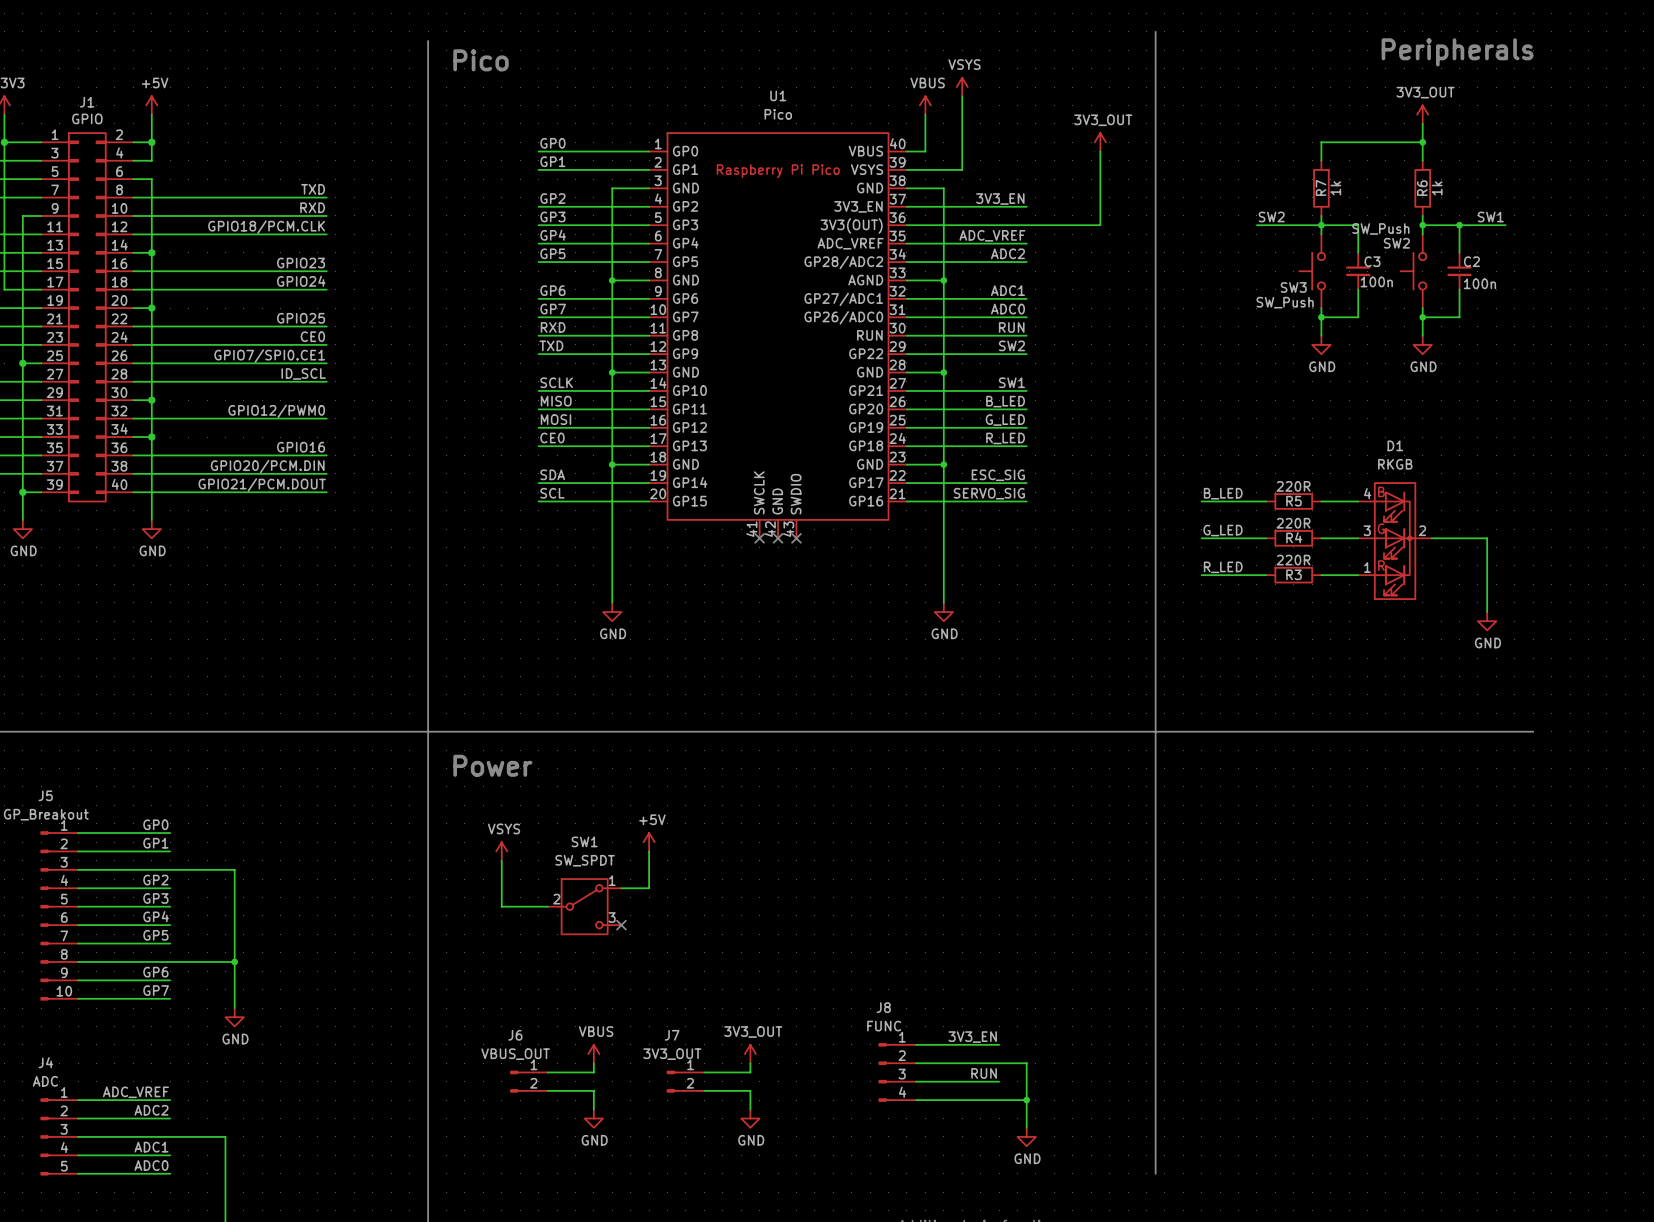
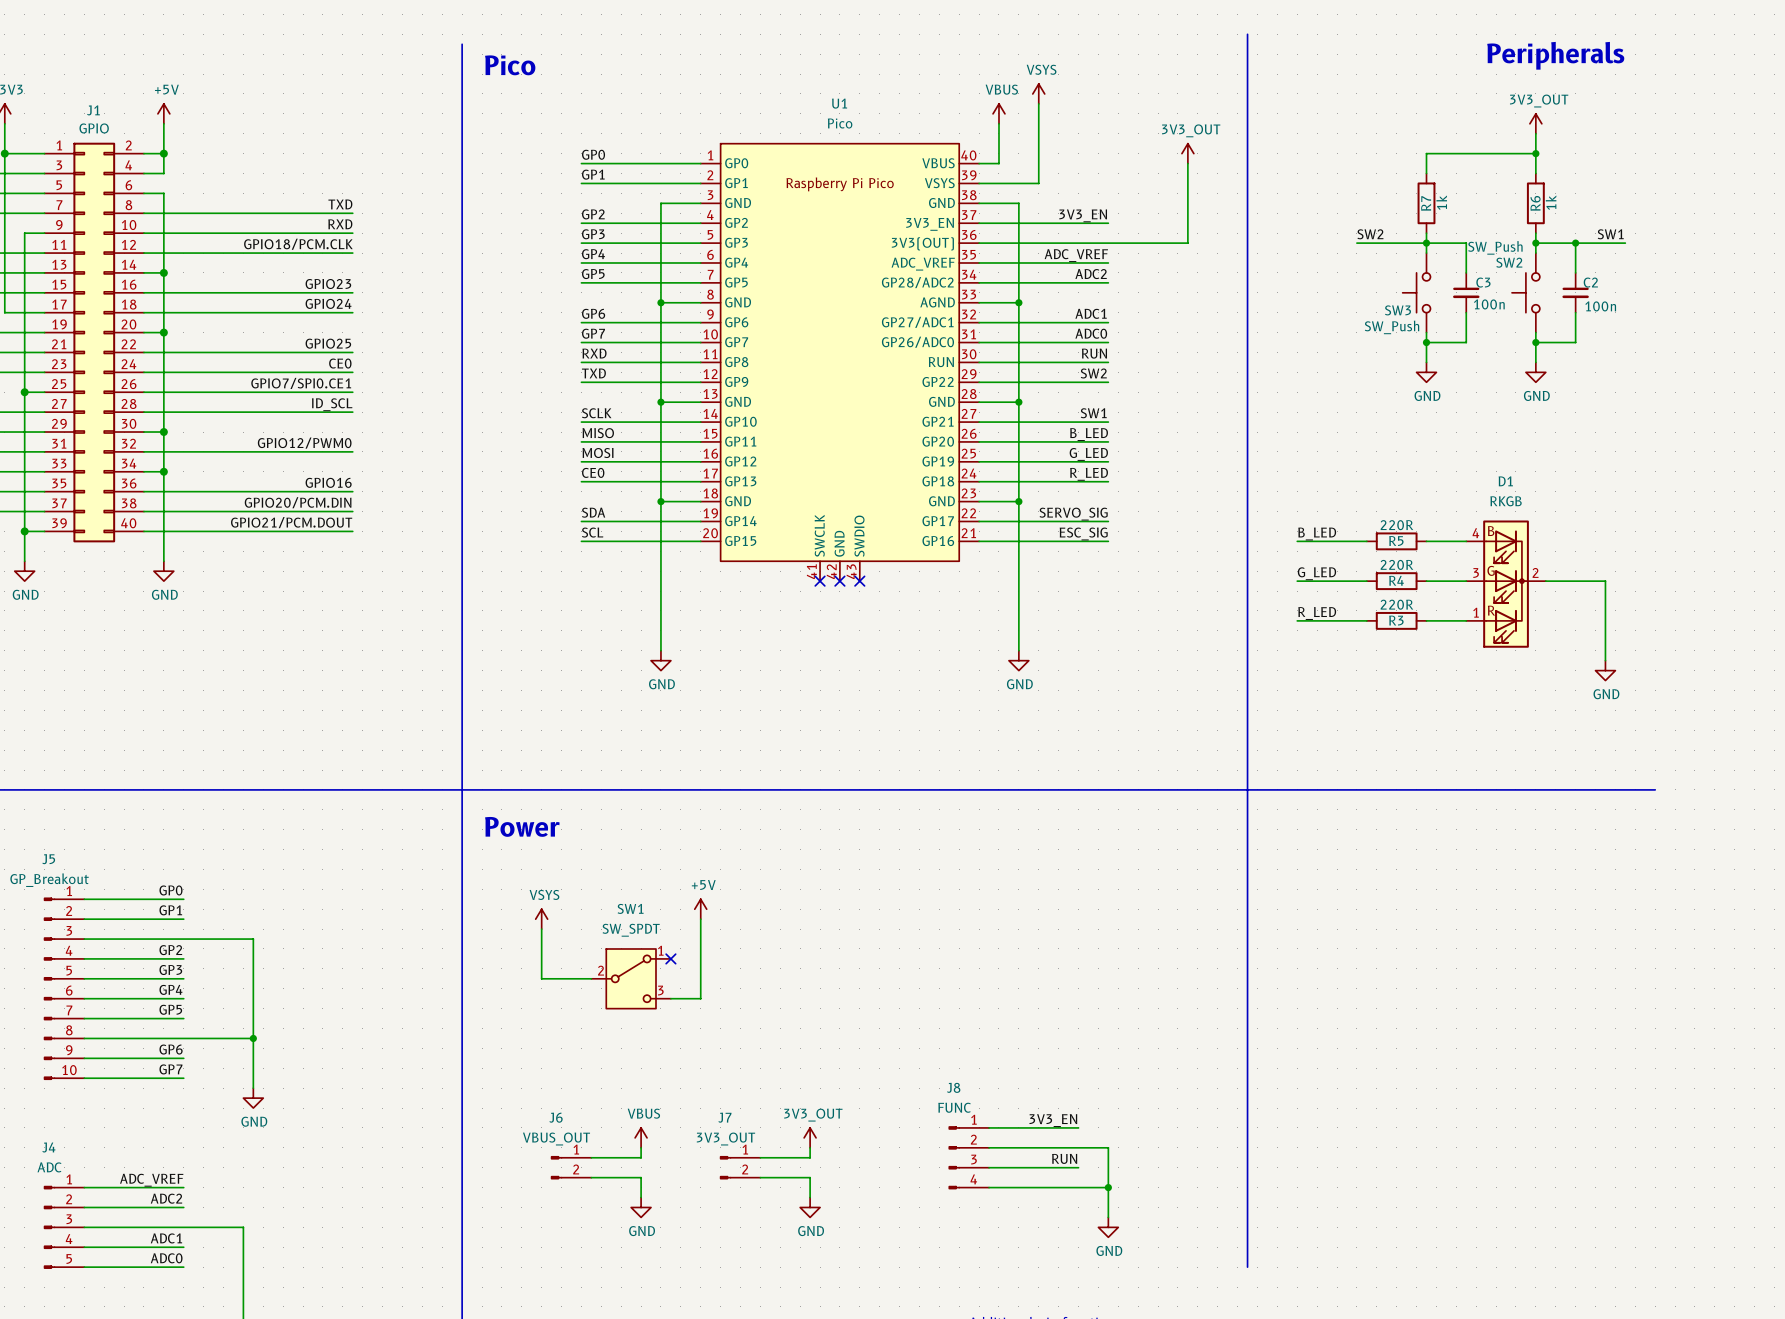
label: ESC_SIG (998, 475) -> SERVO_SIG (1073, 514)
label: SERVO_SIG (989, 493) -> ESC_SIG (1083, 533)
wire: (621, 888) (649, 888) -> (670, 998) (700, 998) (700, 958)
no-connect mark position: (621, 925) -> (670, 958)

